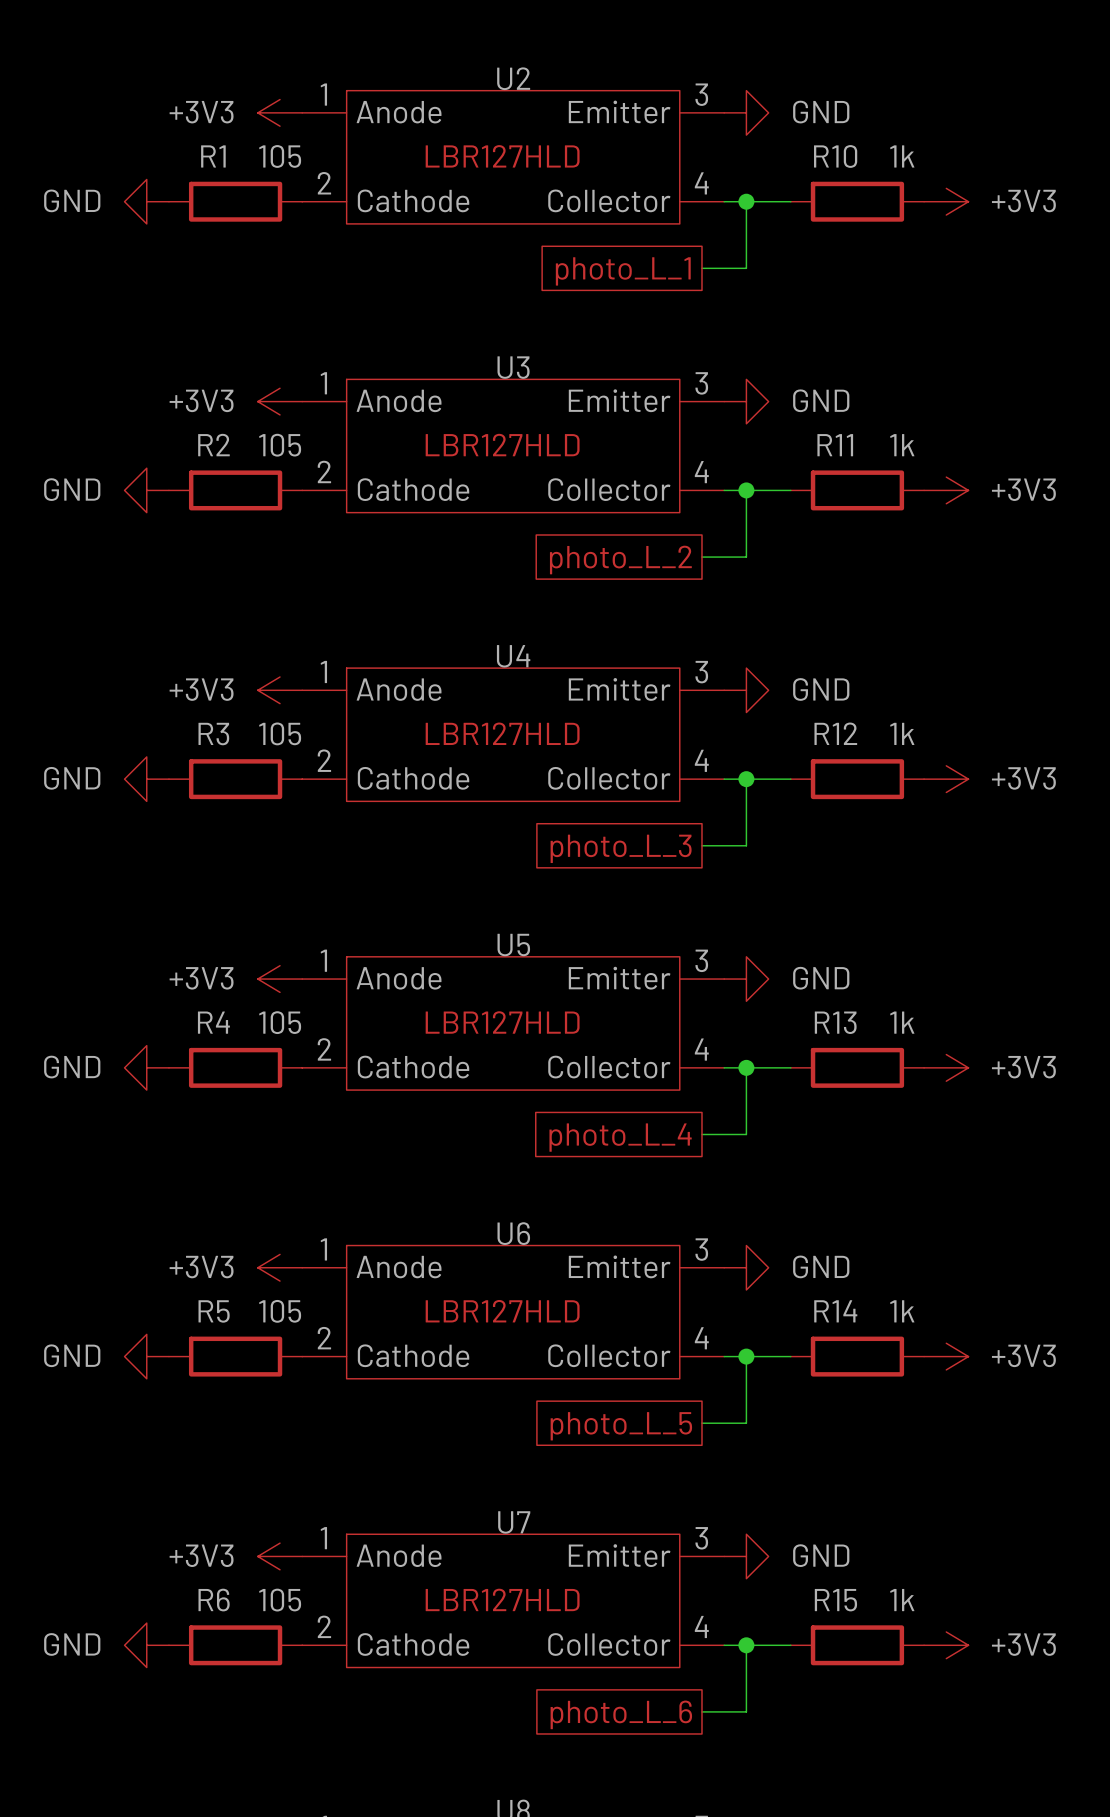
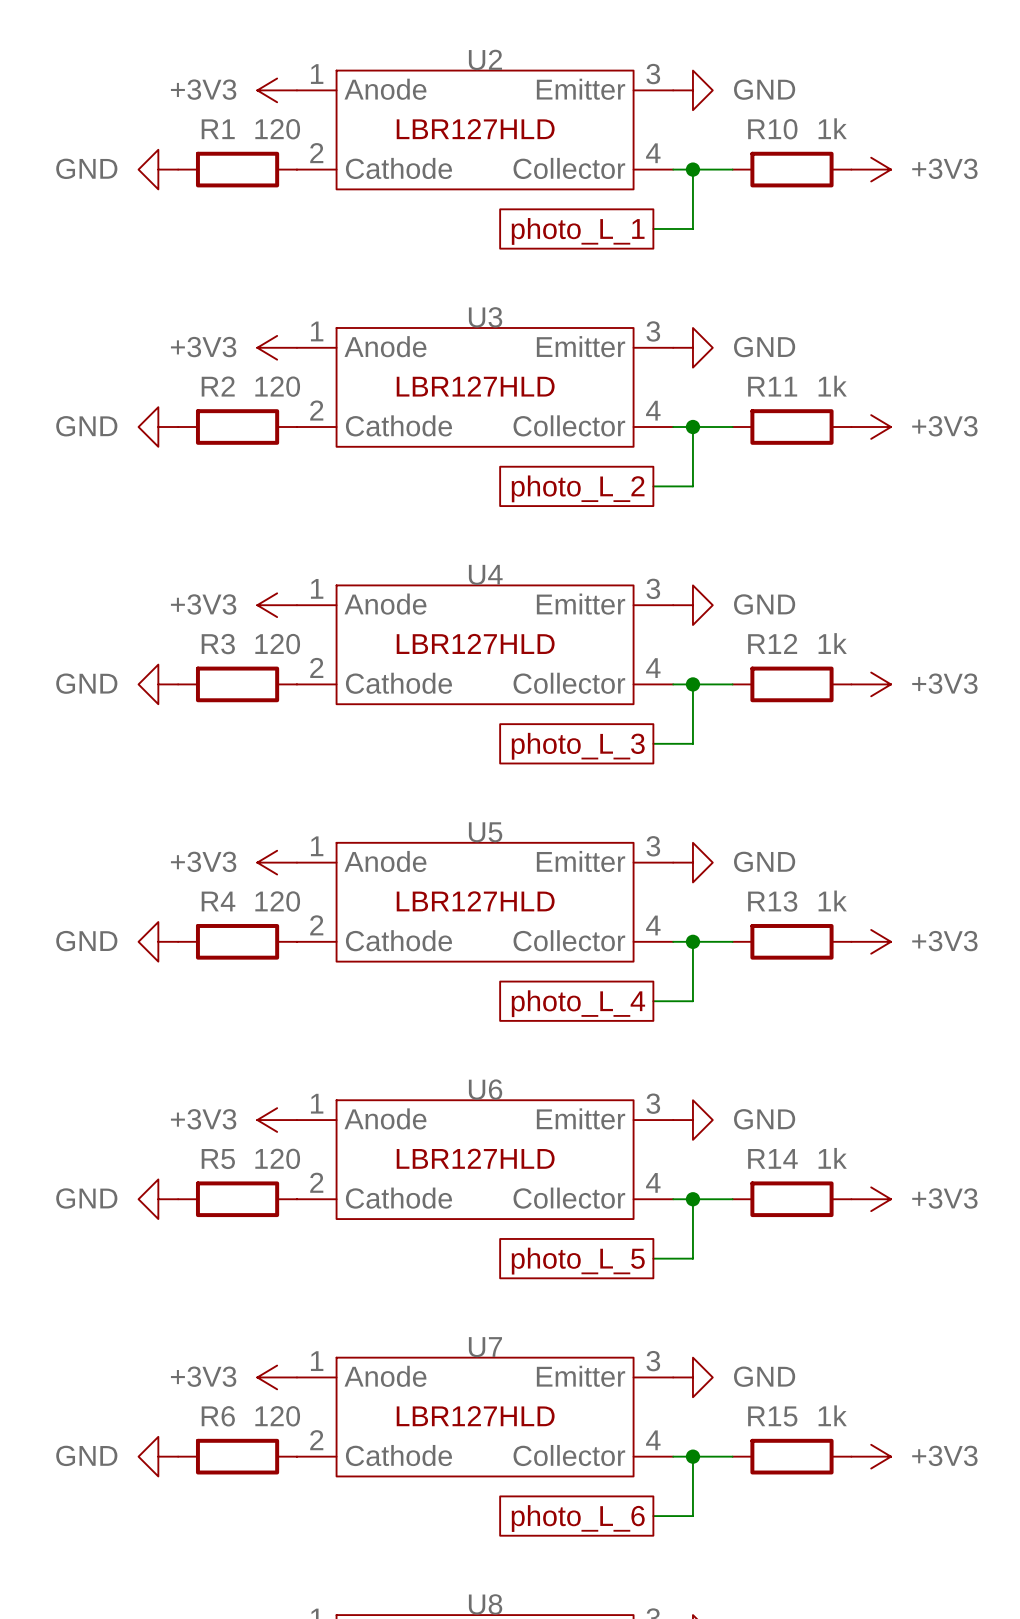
R1 value: 105 (280, 156) -> 120 (277, 129)
R2 value: 105 (280, 445) -> 120 (277, 386)
R3 value: 105 (280, 733) -> 120 (277, 644)
R4 value: 105 (280, 1022) -> 120 (277, 901)
R5 value: 105 (280, 1311) -> 120 (277, 1158)
R6 value: 105 (280, 1600) -> 120 (277, 1416)

